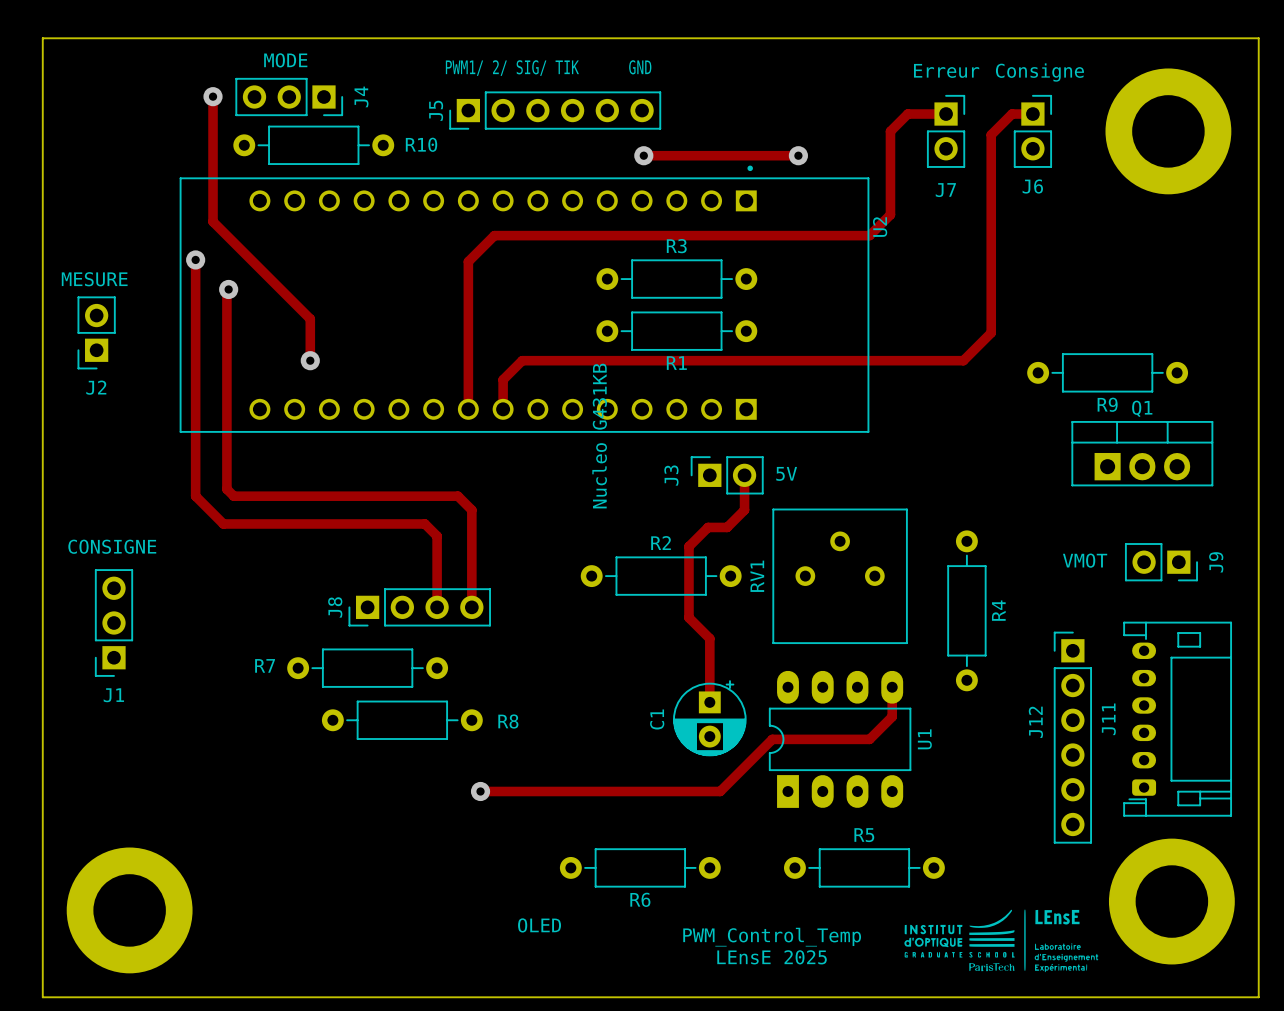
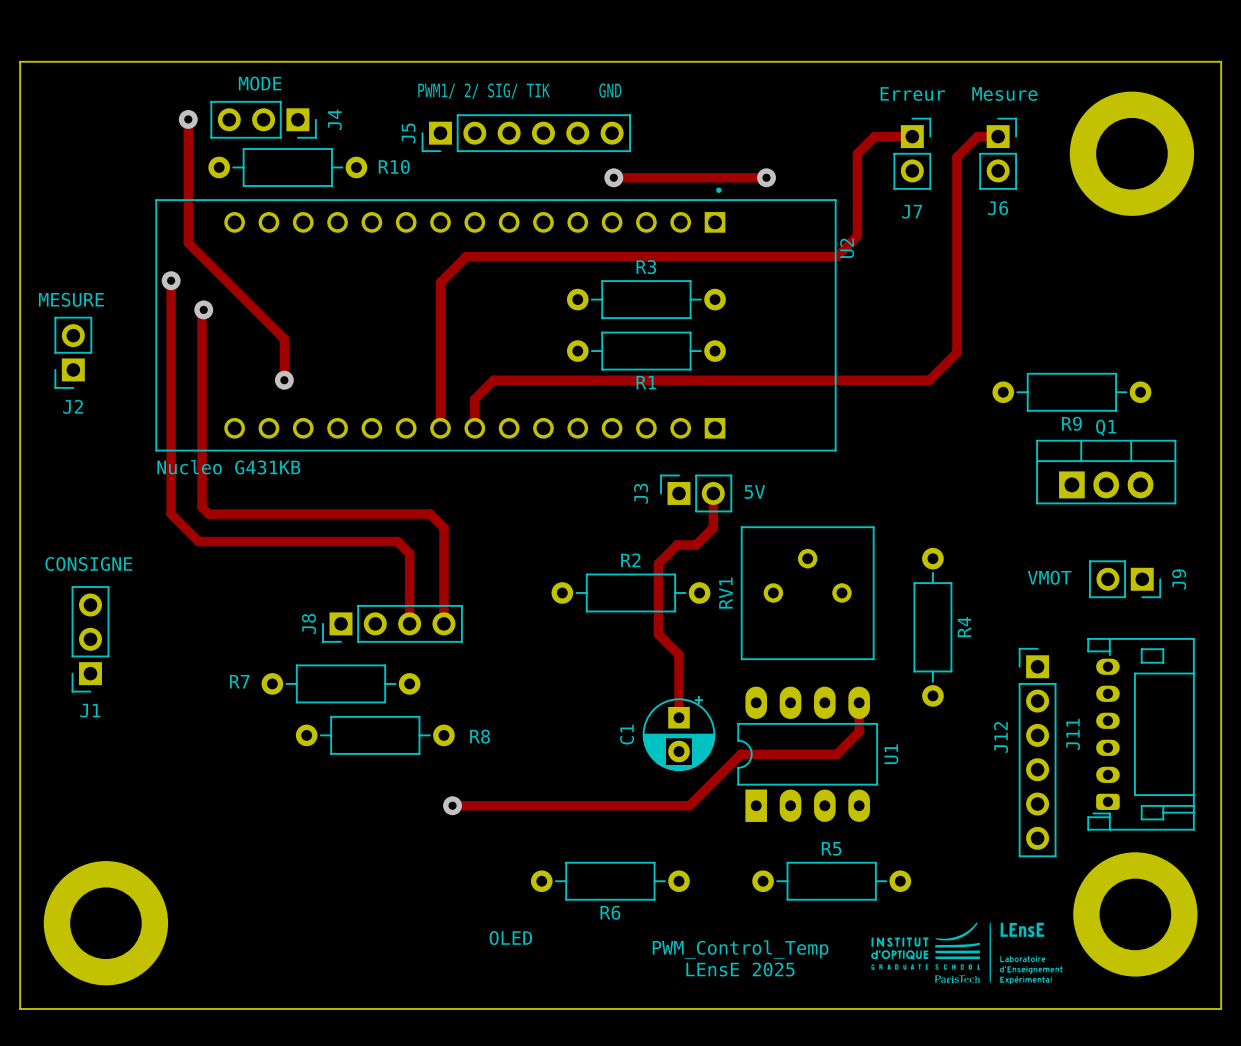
text: Consigne (1039, 72) -> Mesure (1004, 94)
text: Nucleo G431KB (599, 436) -> none
text: none -> Nucleo G431KB (228, 467)

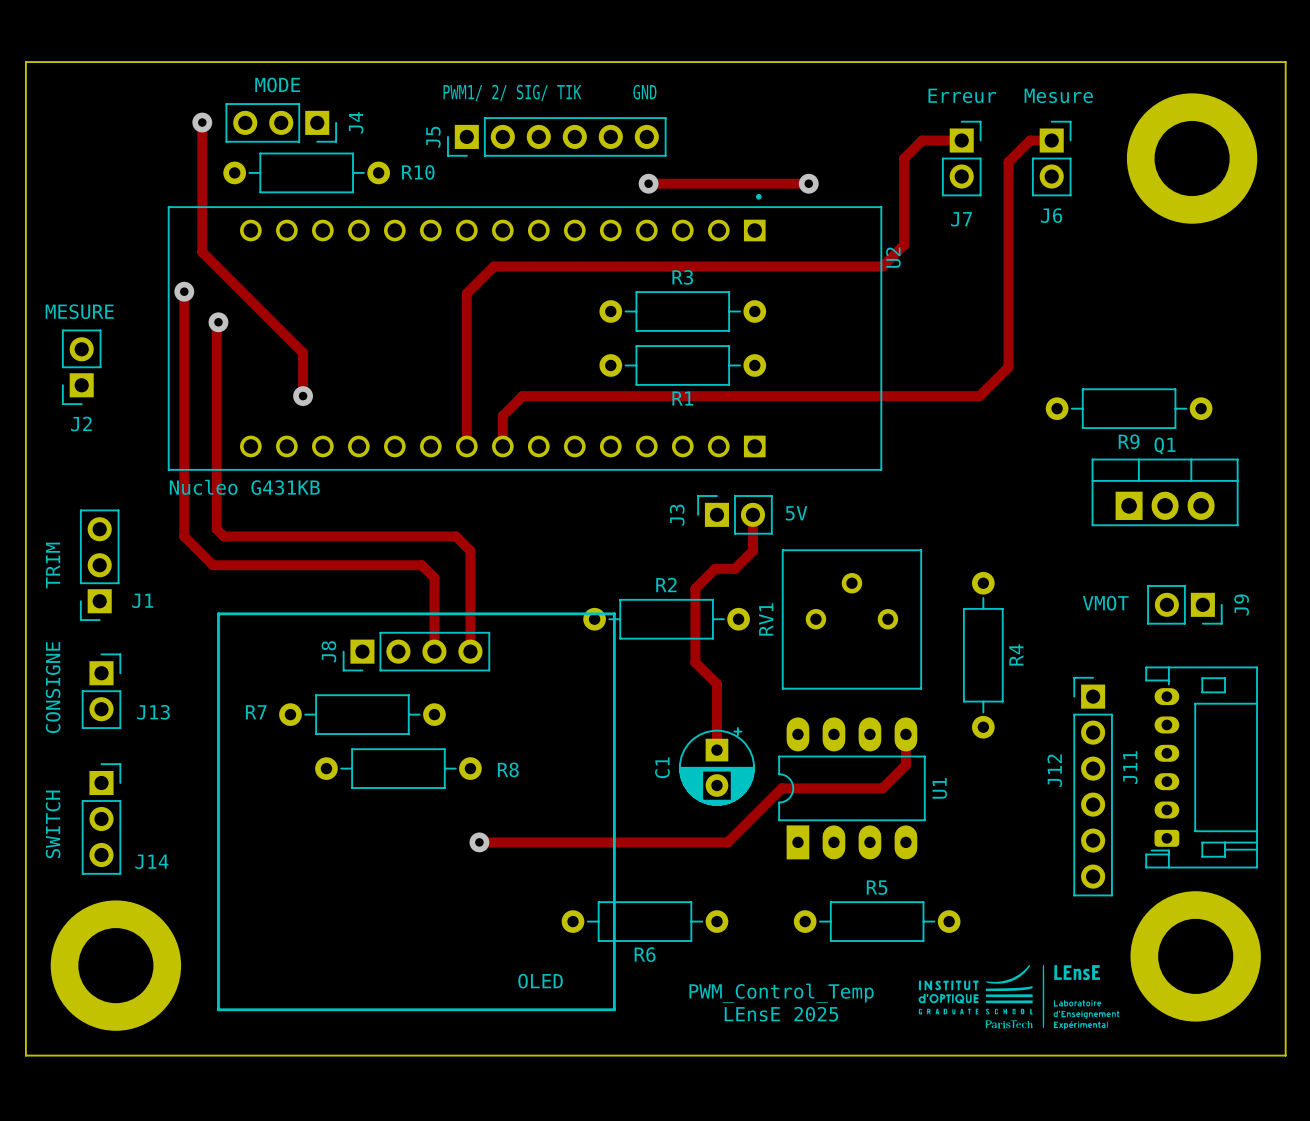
text: none -> TRIM (53, 565)
text rotation: 0° (88, 563) -> 90° counterclockwise (53, 687)
line: none -> (218, 613) (614, 613) (614, 1009) (218, 1009) (218, 613)
J1 position: (90, 639) -> (99, 565)
J13: none -> (101, 691)
J1 name position: J1 (90, 710) -> J1 (142, 600)
J14: none -> (101, 818)
text: none -> SWITCH (53, 824)

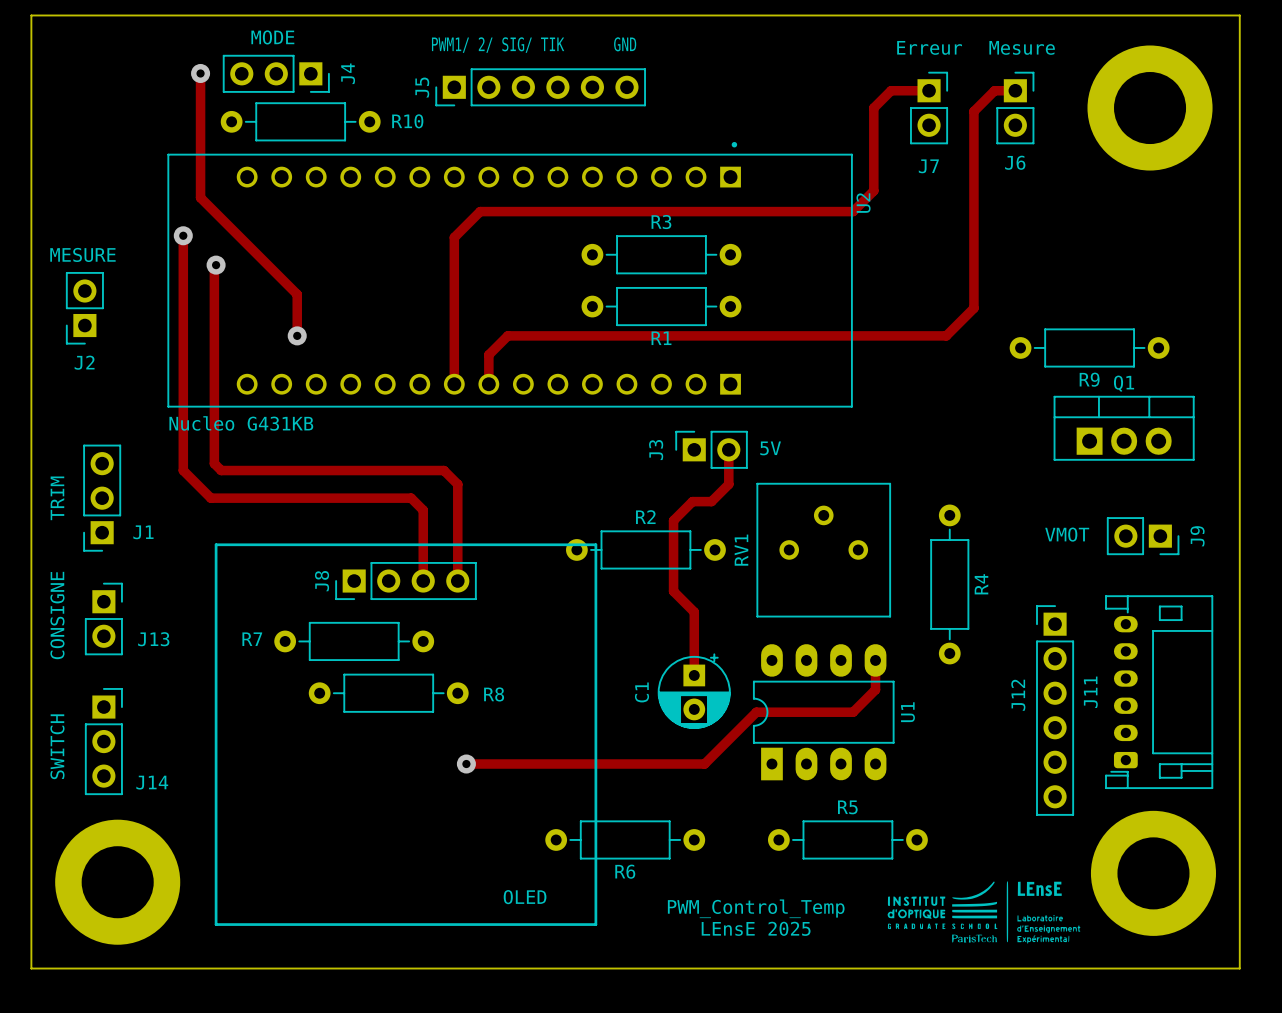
track: (648, 183) (808, 183) -> none
via: (648, 183) -> none
via: (808, 183) -> none

